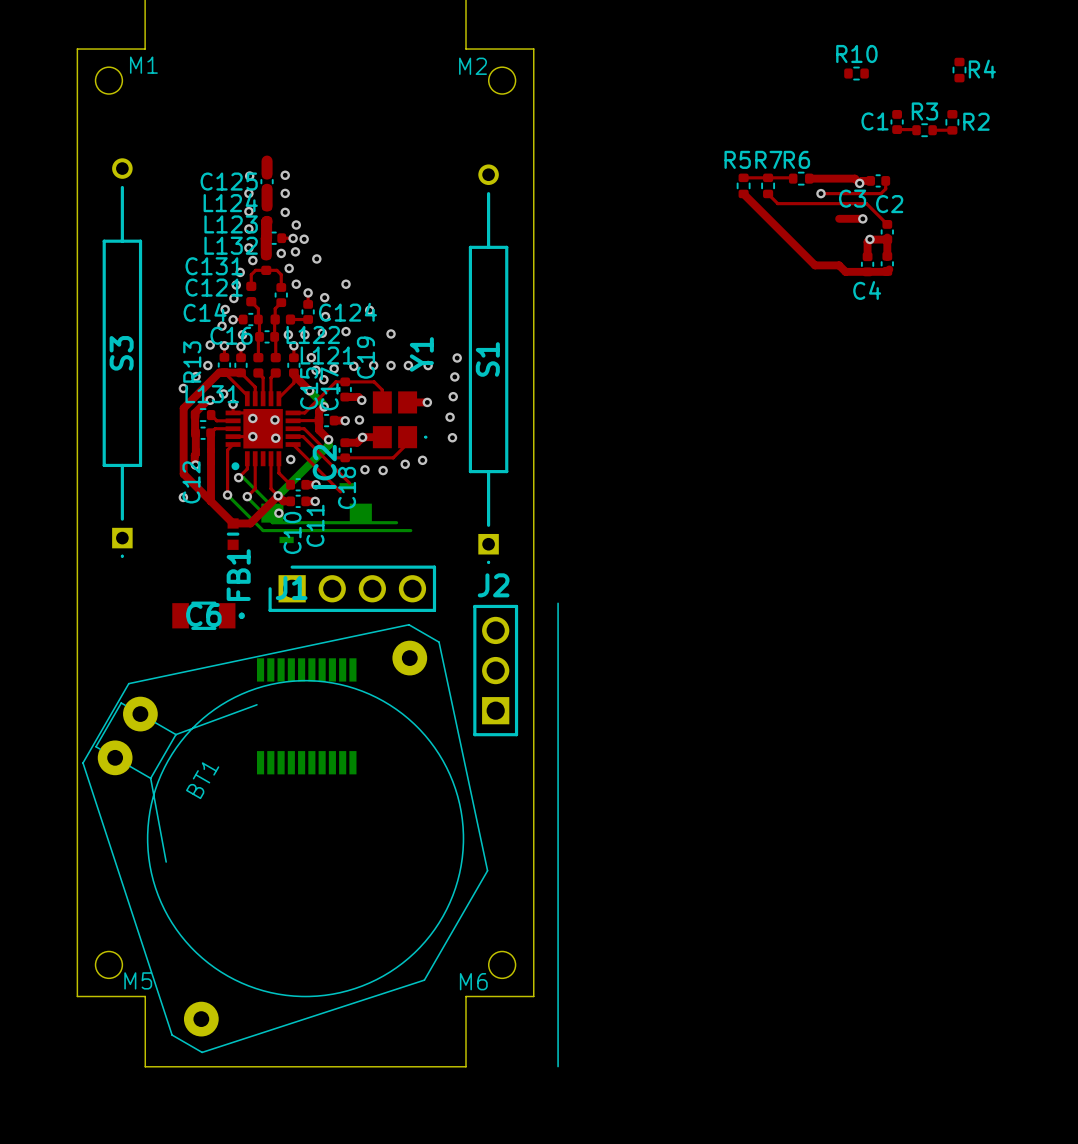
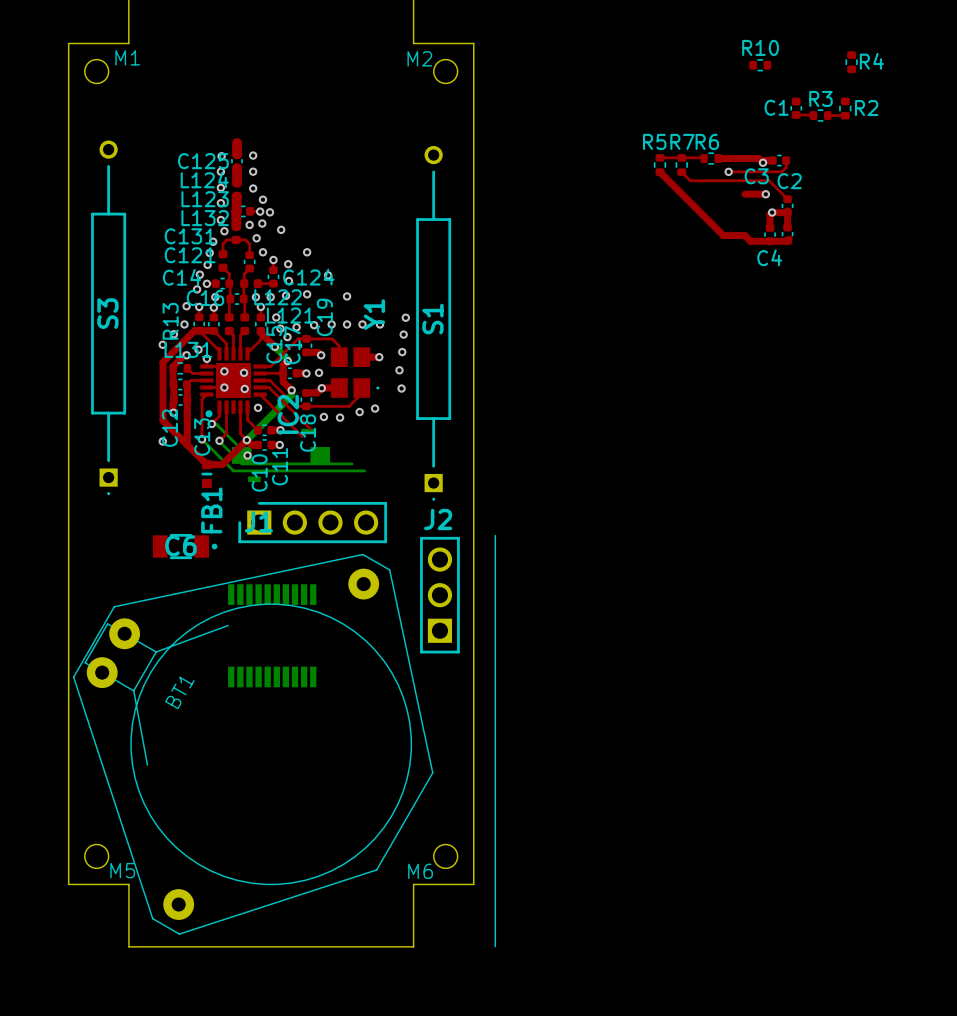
C13: none -> (180, 399)

